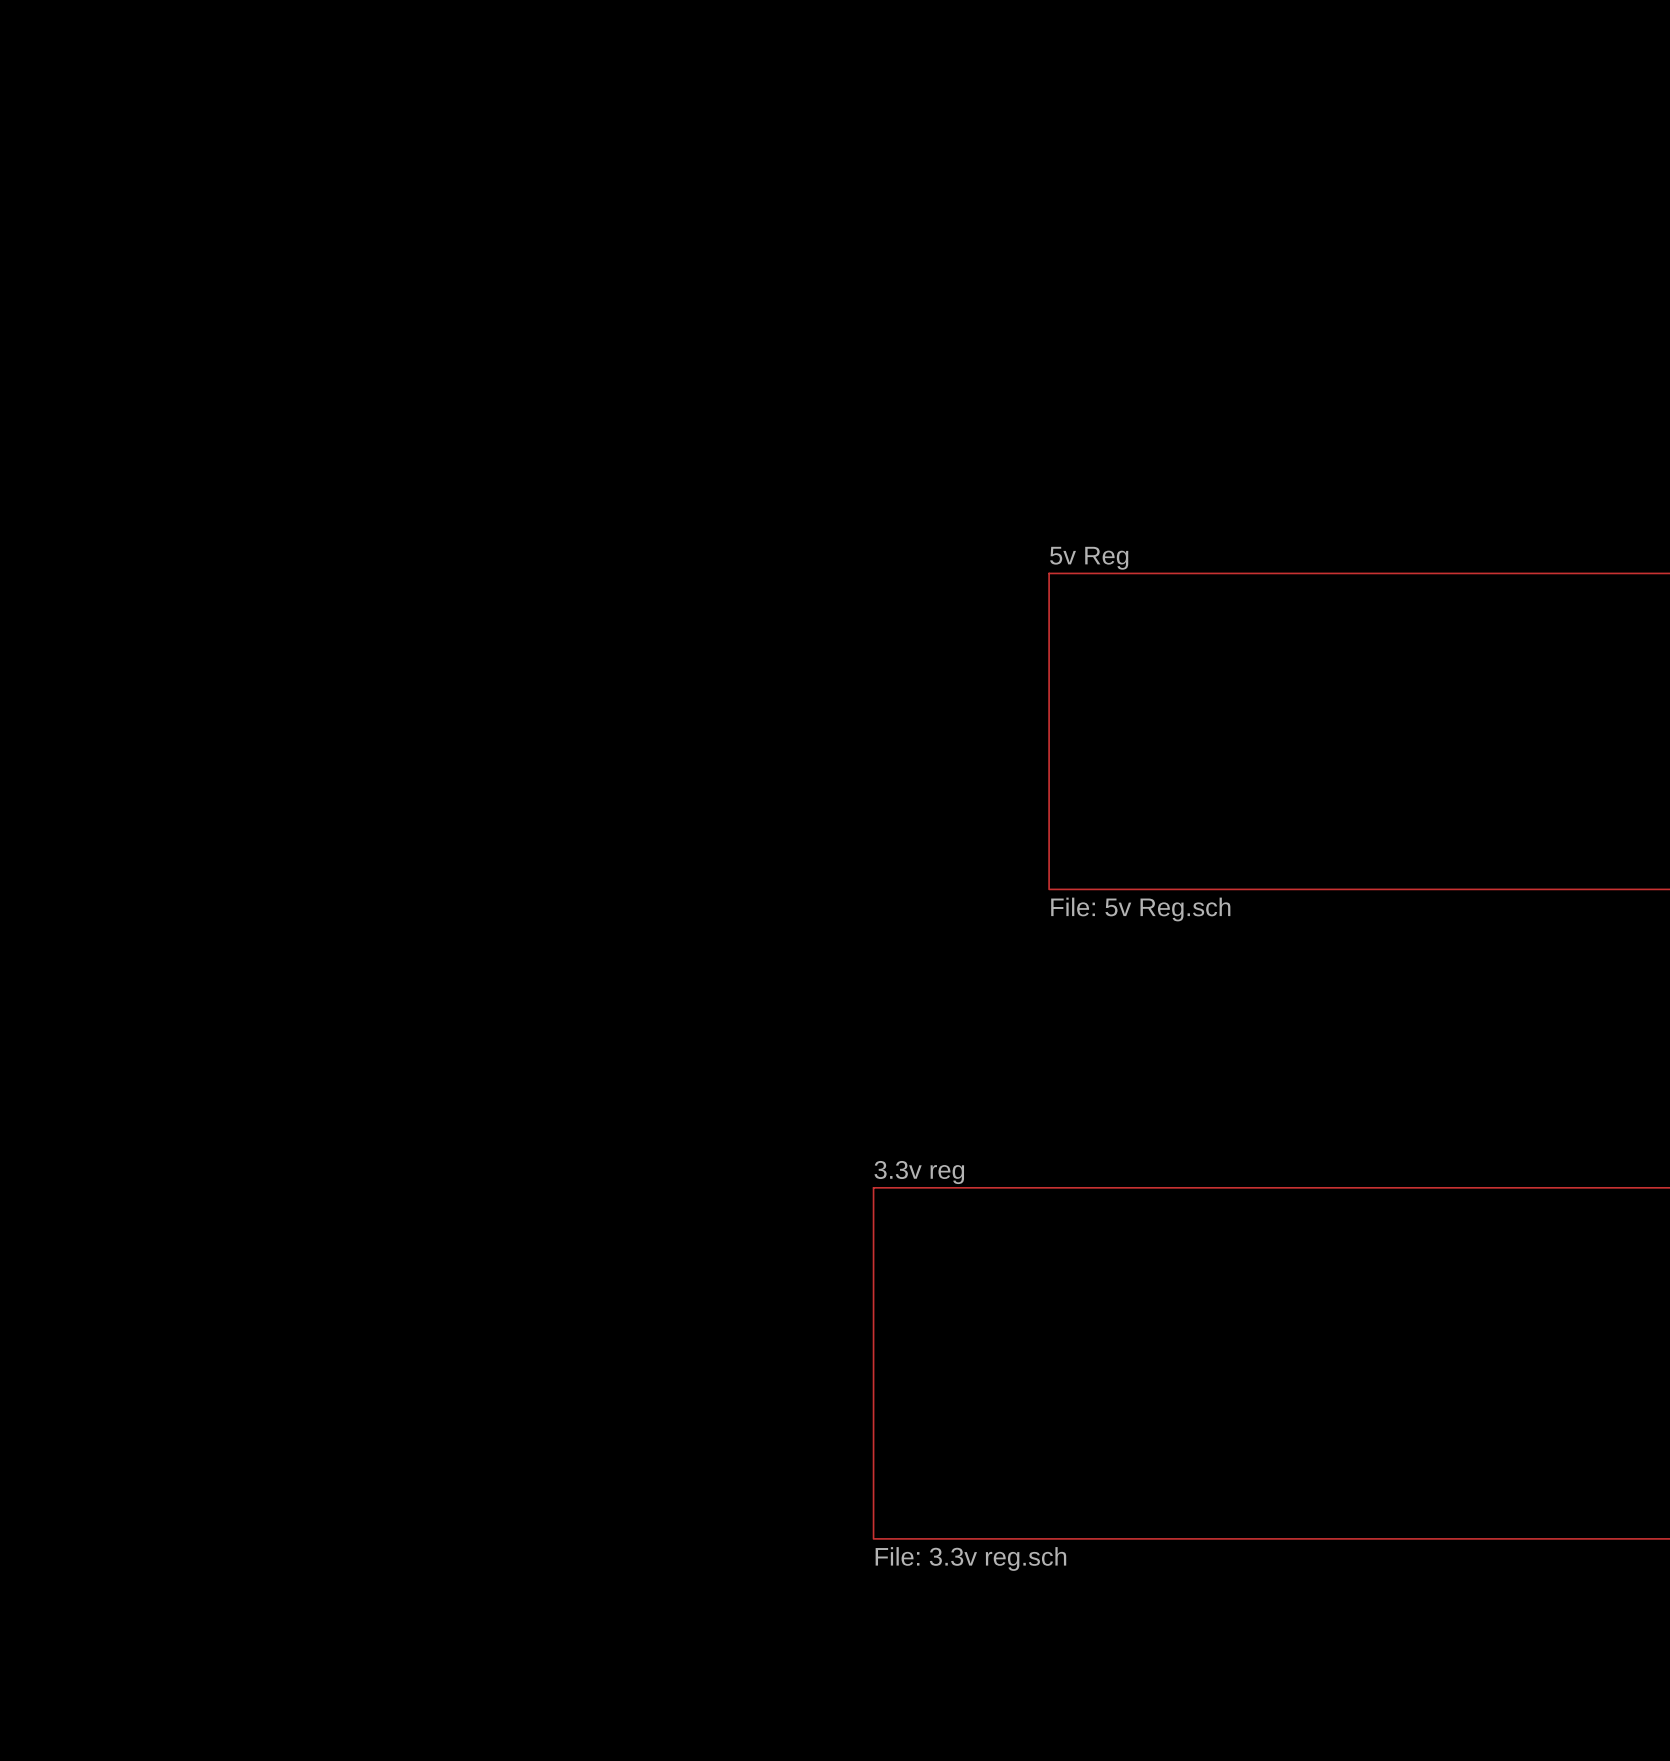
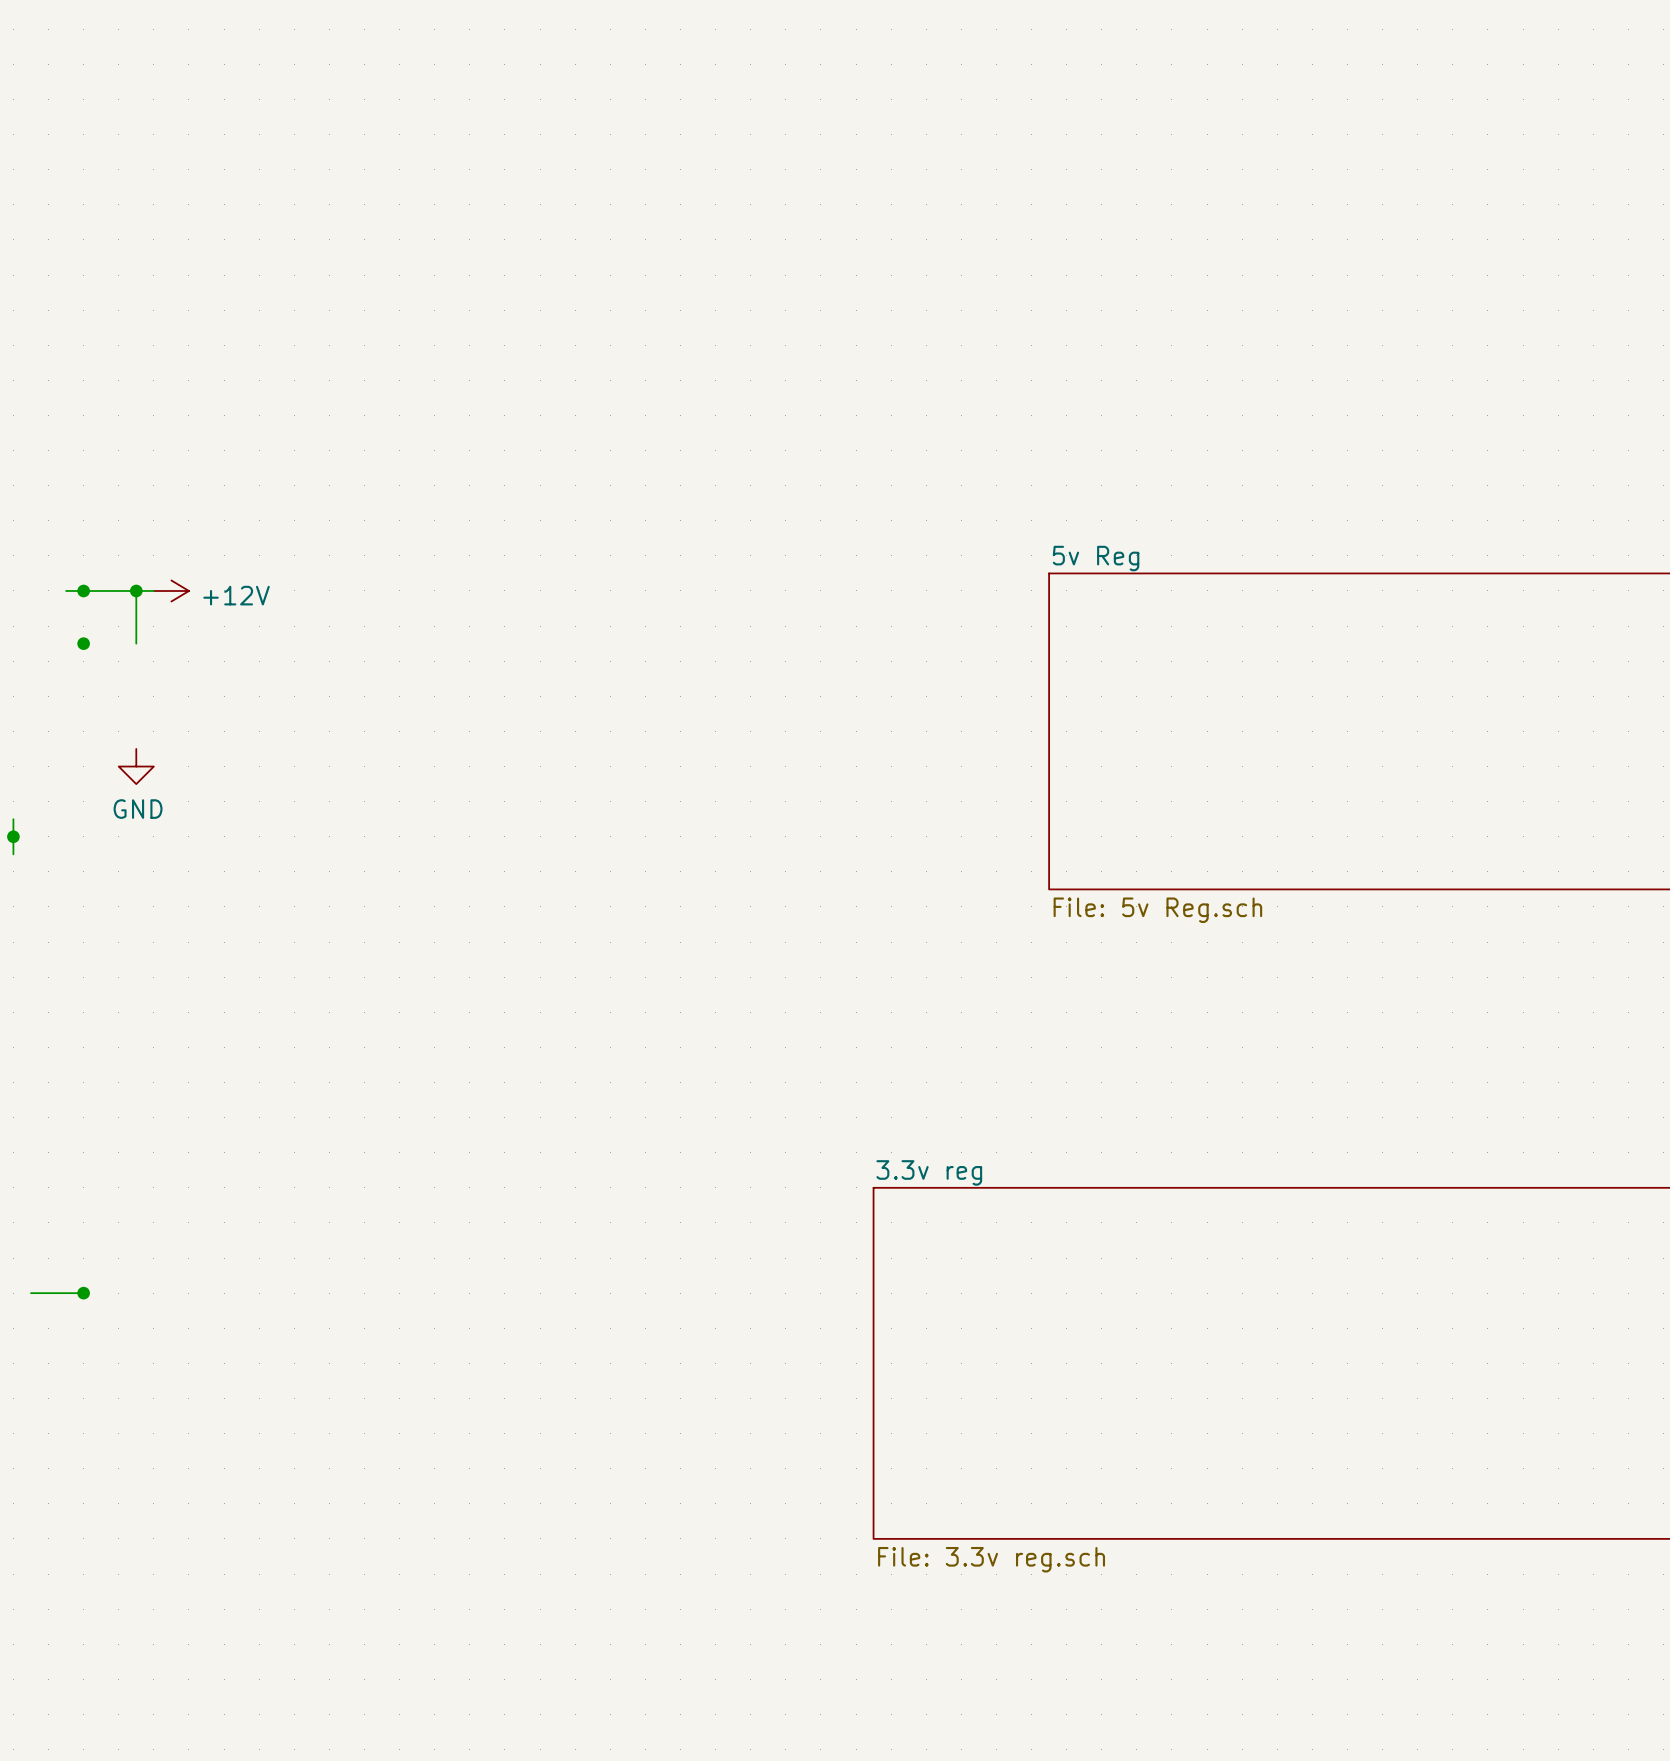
wire: none -> (66, 590) (153, 590)
junction: none -> (83, 590)
wire: none -> (136, 590) (136, 643)
junction: none -> (136, 590)
power symbol: none -> +12V (171, 590)
junction: none -> (83, 643)
power symbol: none -> GND (136, 766)
wire: none -> (13, 819) (13, 854)
junction: none -> (13, 836)
wire: none -> (30, 1293) (83, 1293)
junction: none -> (83, 1293)

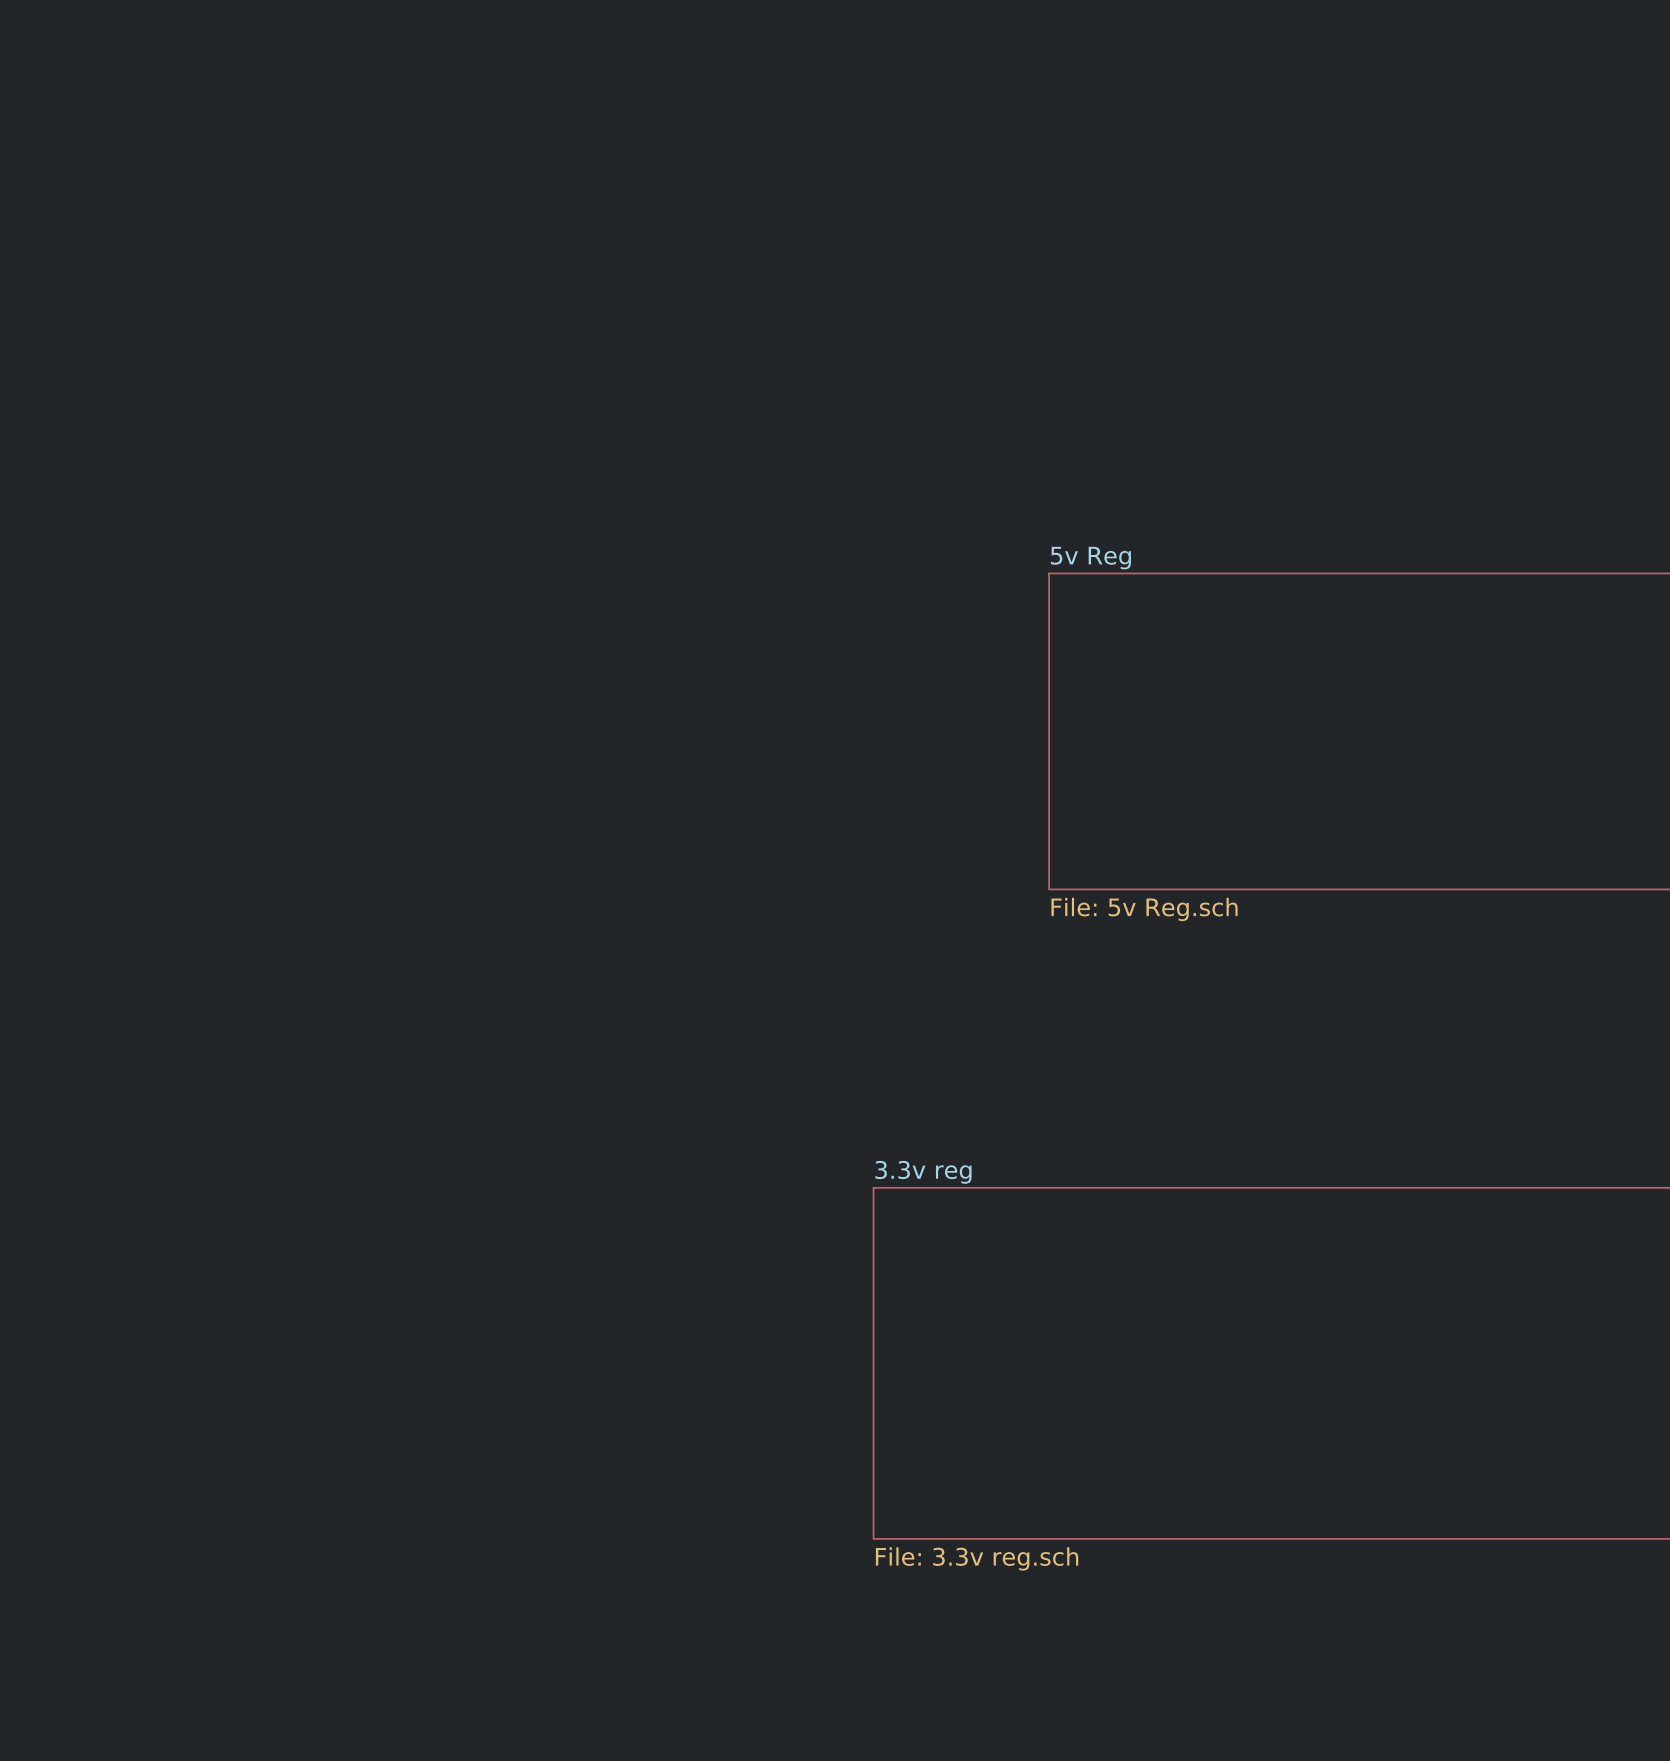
wire: (66, 590) (153, 590) -> none
junction: (83, 590) -> none
wire: (136, 590) (136, 643) -> none
junction: (136, 590) -> none
power symbol: +12V (171, 590) -> none
junction: (83, 643) -> none
power symbol: GND (136, 766) -> none
wire: (13, 819) (13, 854) -> none
junction: (13, 836) -> none
wire: (30, 1293) (83, 1293) -> none
junction: (83, 1293) -> none

